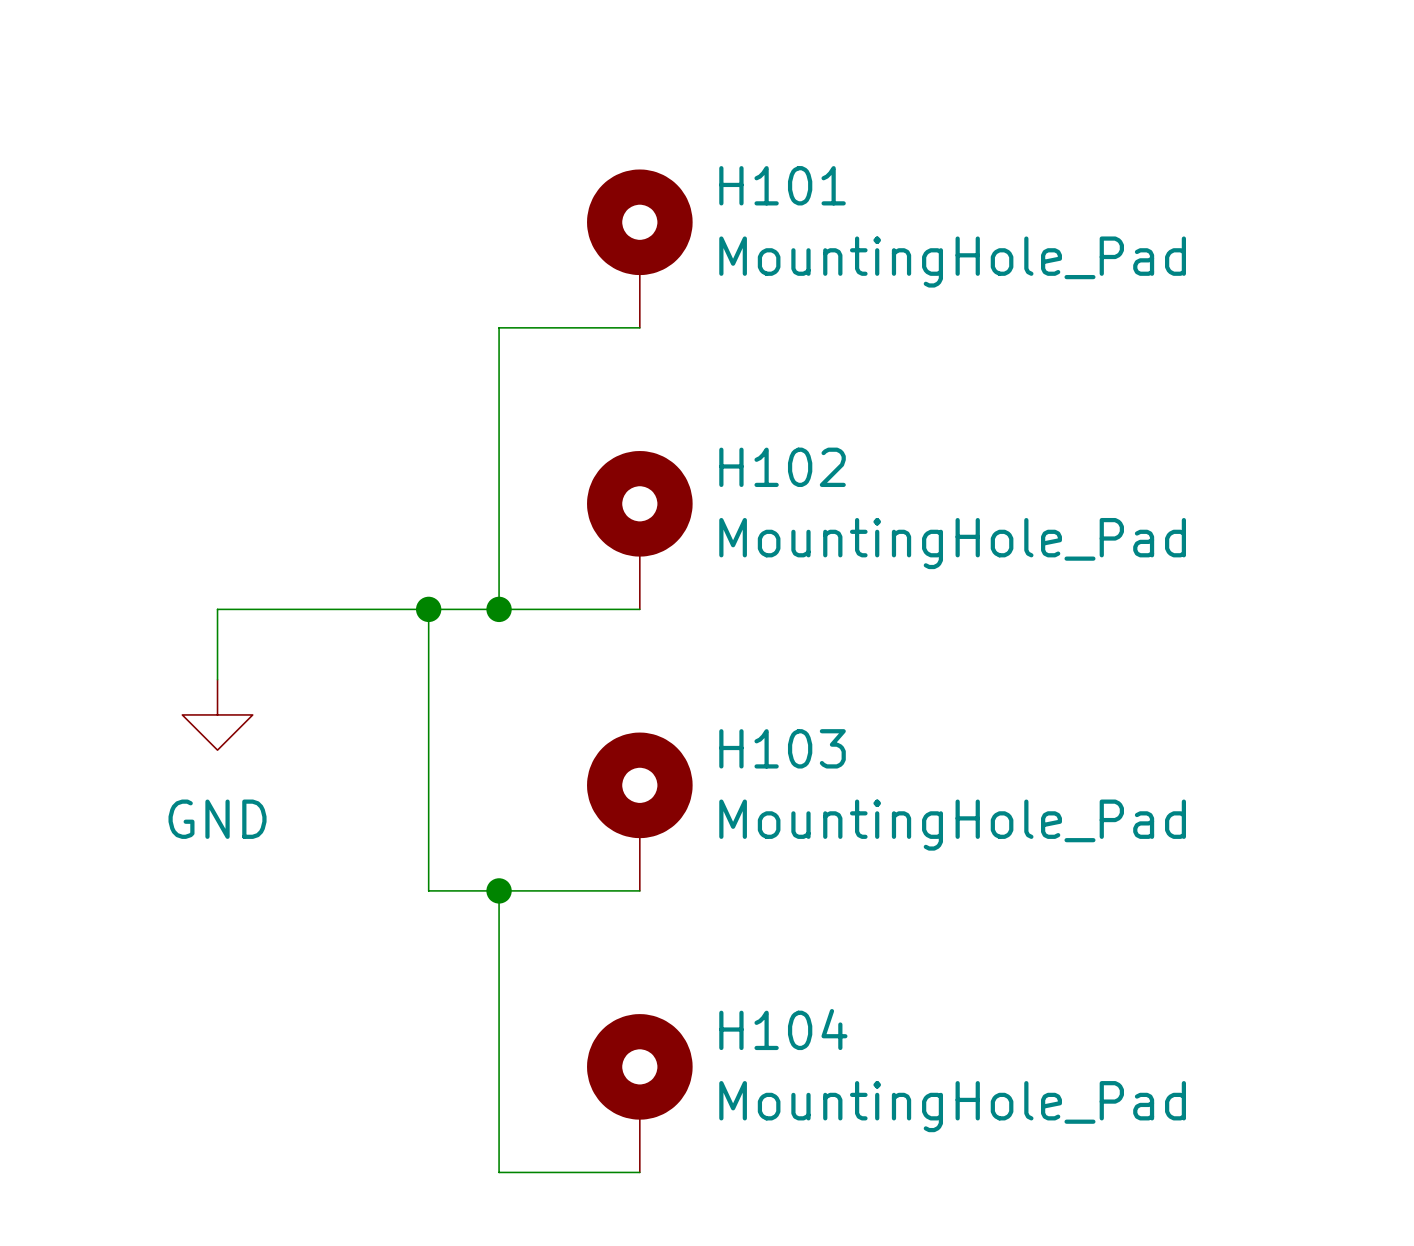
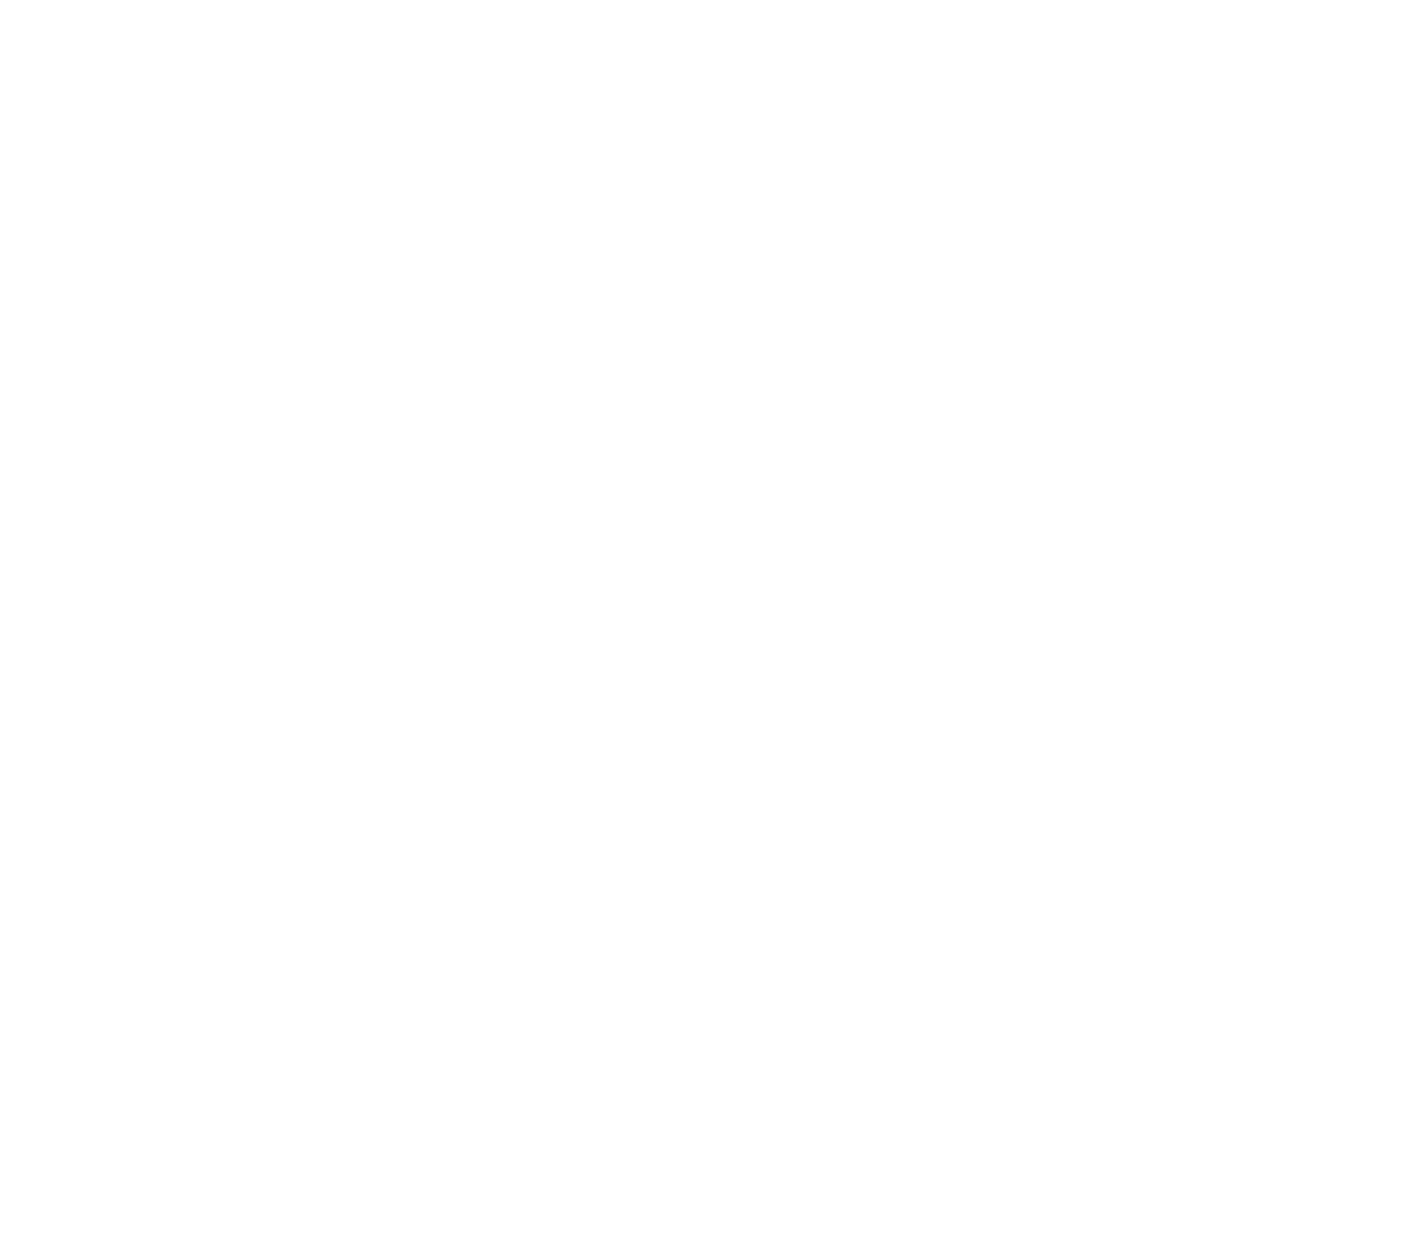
H101: MountingHole_Pad (639, 248) -> none
wire: (639, 327) (499, 327) (499, 609) -> none
H102: MountingHole_Pad (639, 530) -> none
wire: (428, 609) (428, 890) (639, 890) -> none
junction: (428, 609) -> none
junction: (499, 609) -> none
wire: (639, 609) (217, 609) (217, 679) -> none
power symbol: GND (217, 714) -> none
H103: MountingHole_Pad (639, 811) -> none
wire: (499, 890) (499, 1172) (639, 1172) -> none
junction: (499, 890) -> none
H104: MountingHole_Pad (639, 1093) -> none

